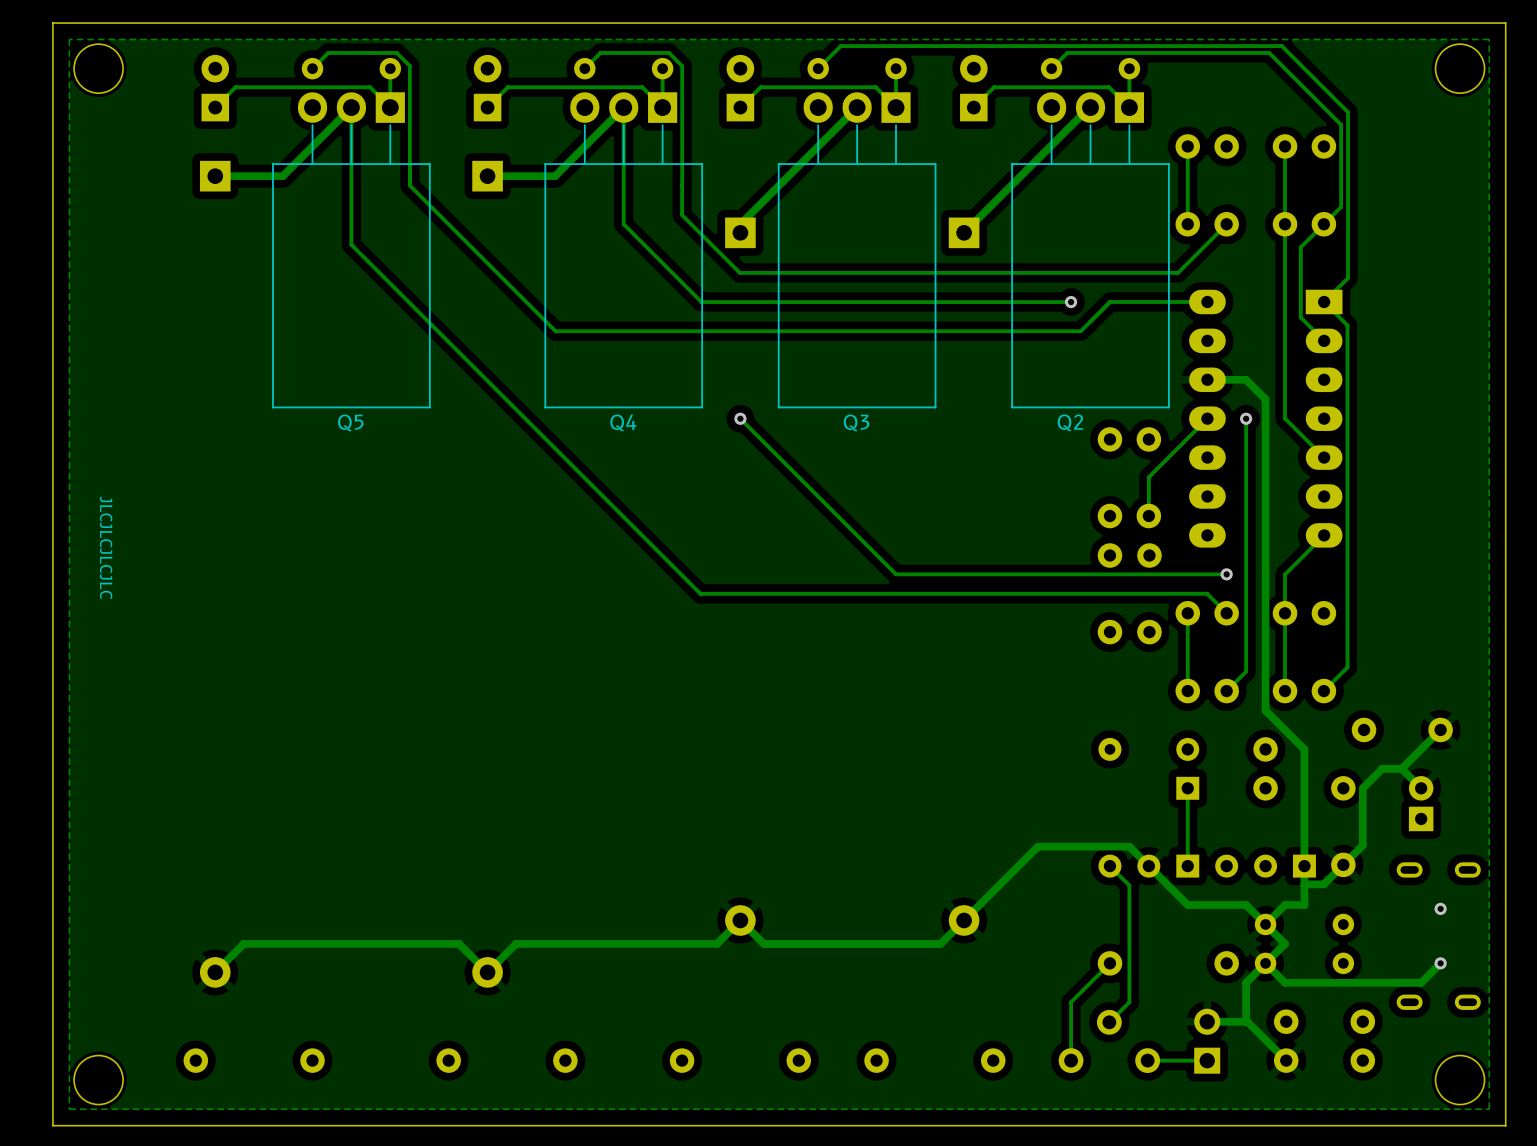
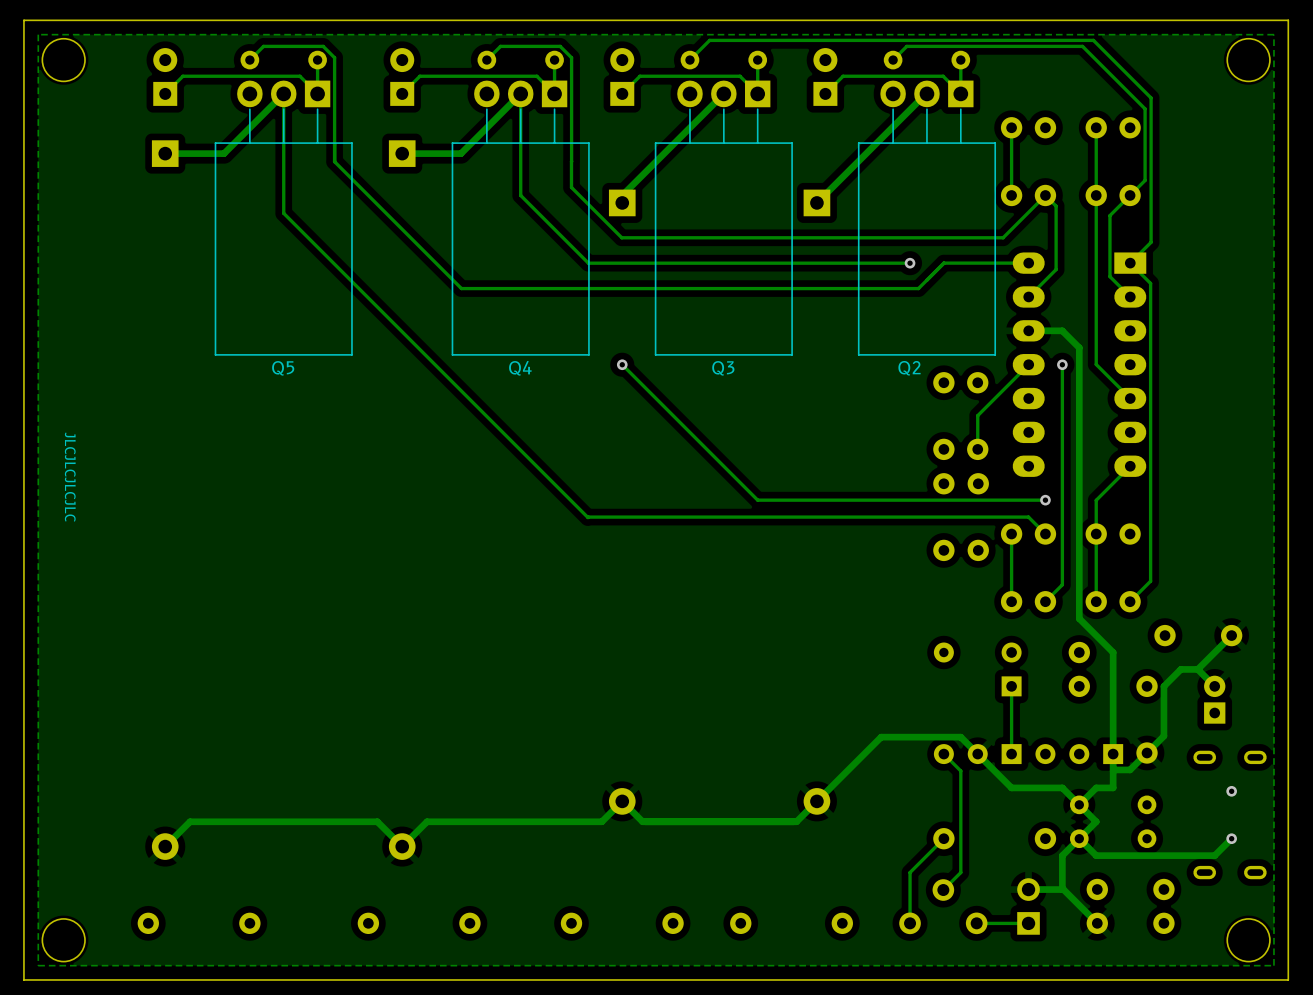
track: none -> (1045, 195) (1056, 206) (1056, 269) (1028, 296)

